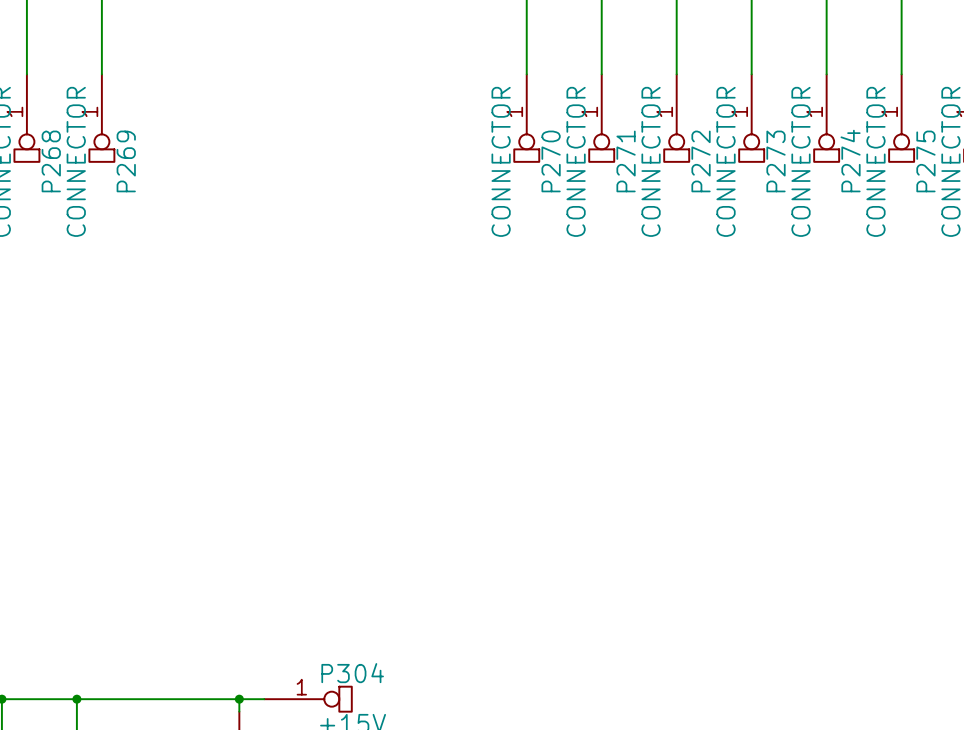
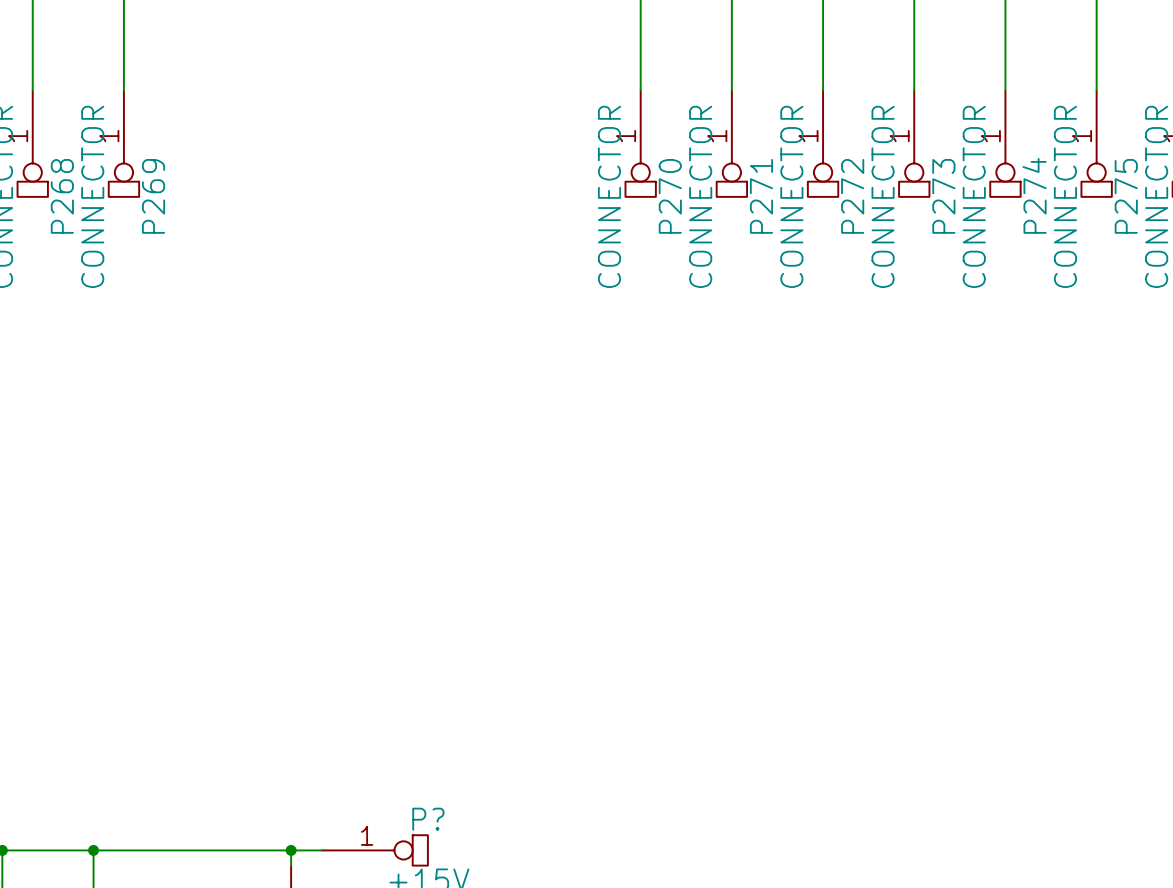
P304 name: P304 (352, 673) -> P? (428, 819)

